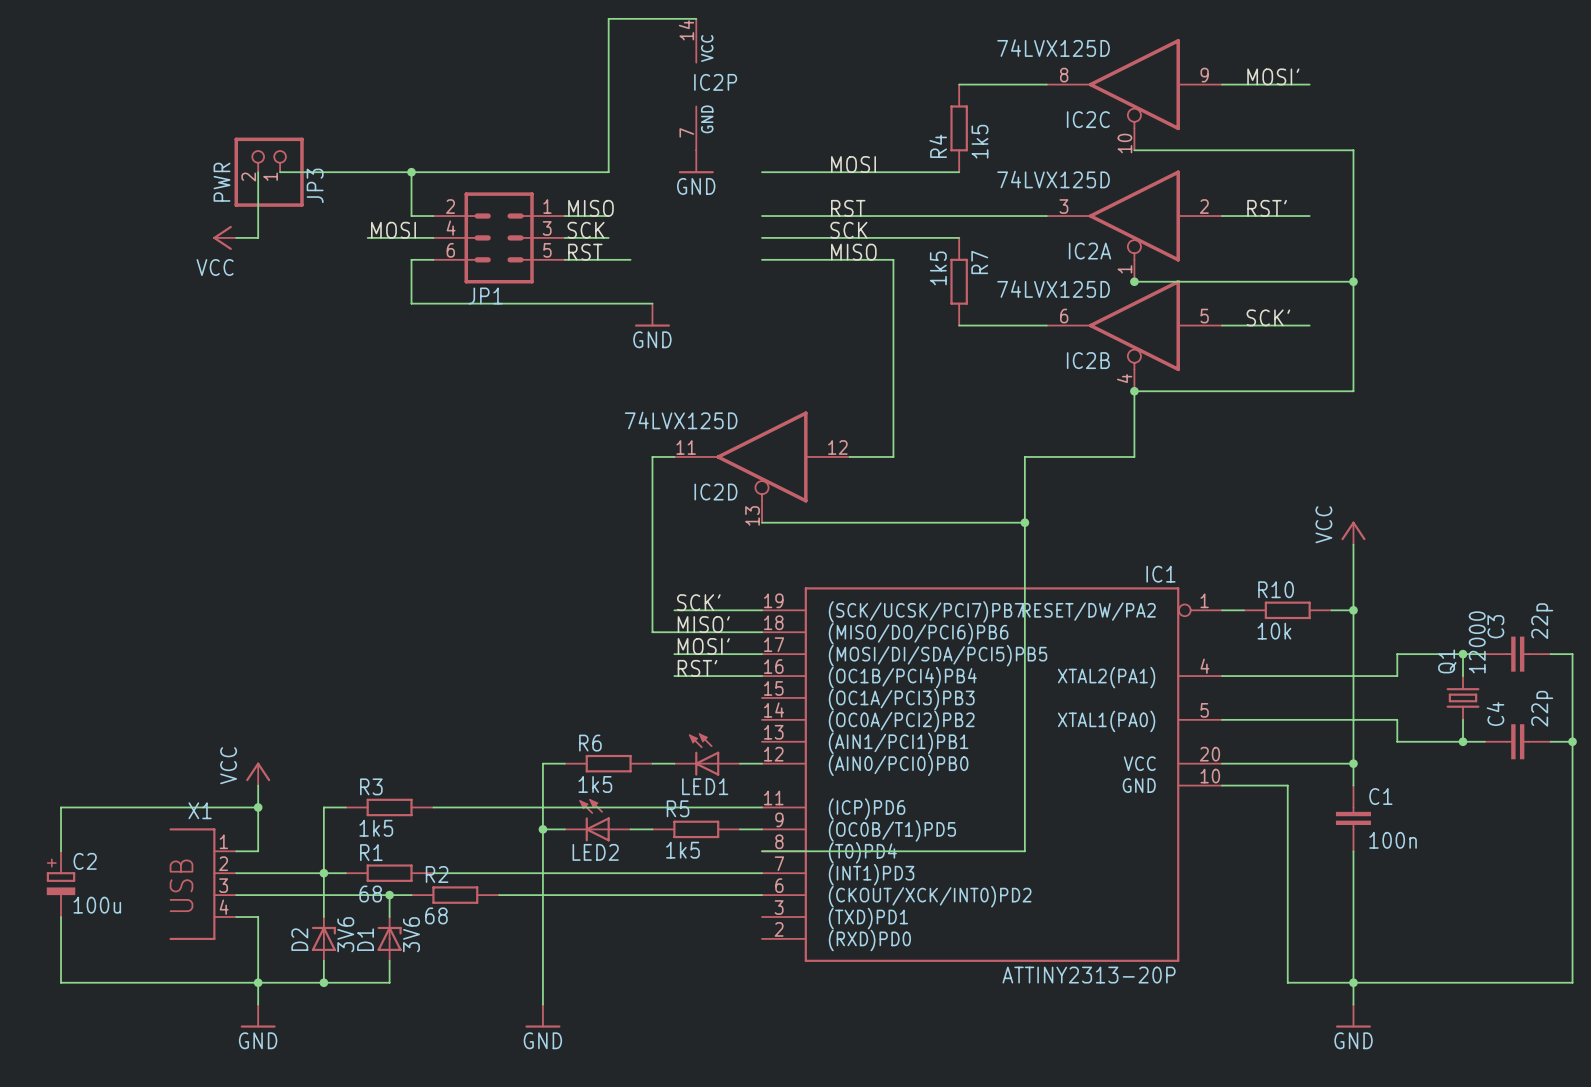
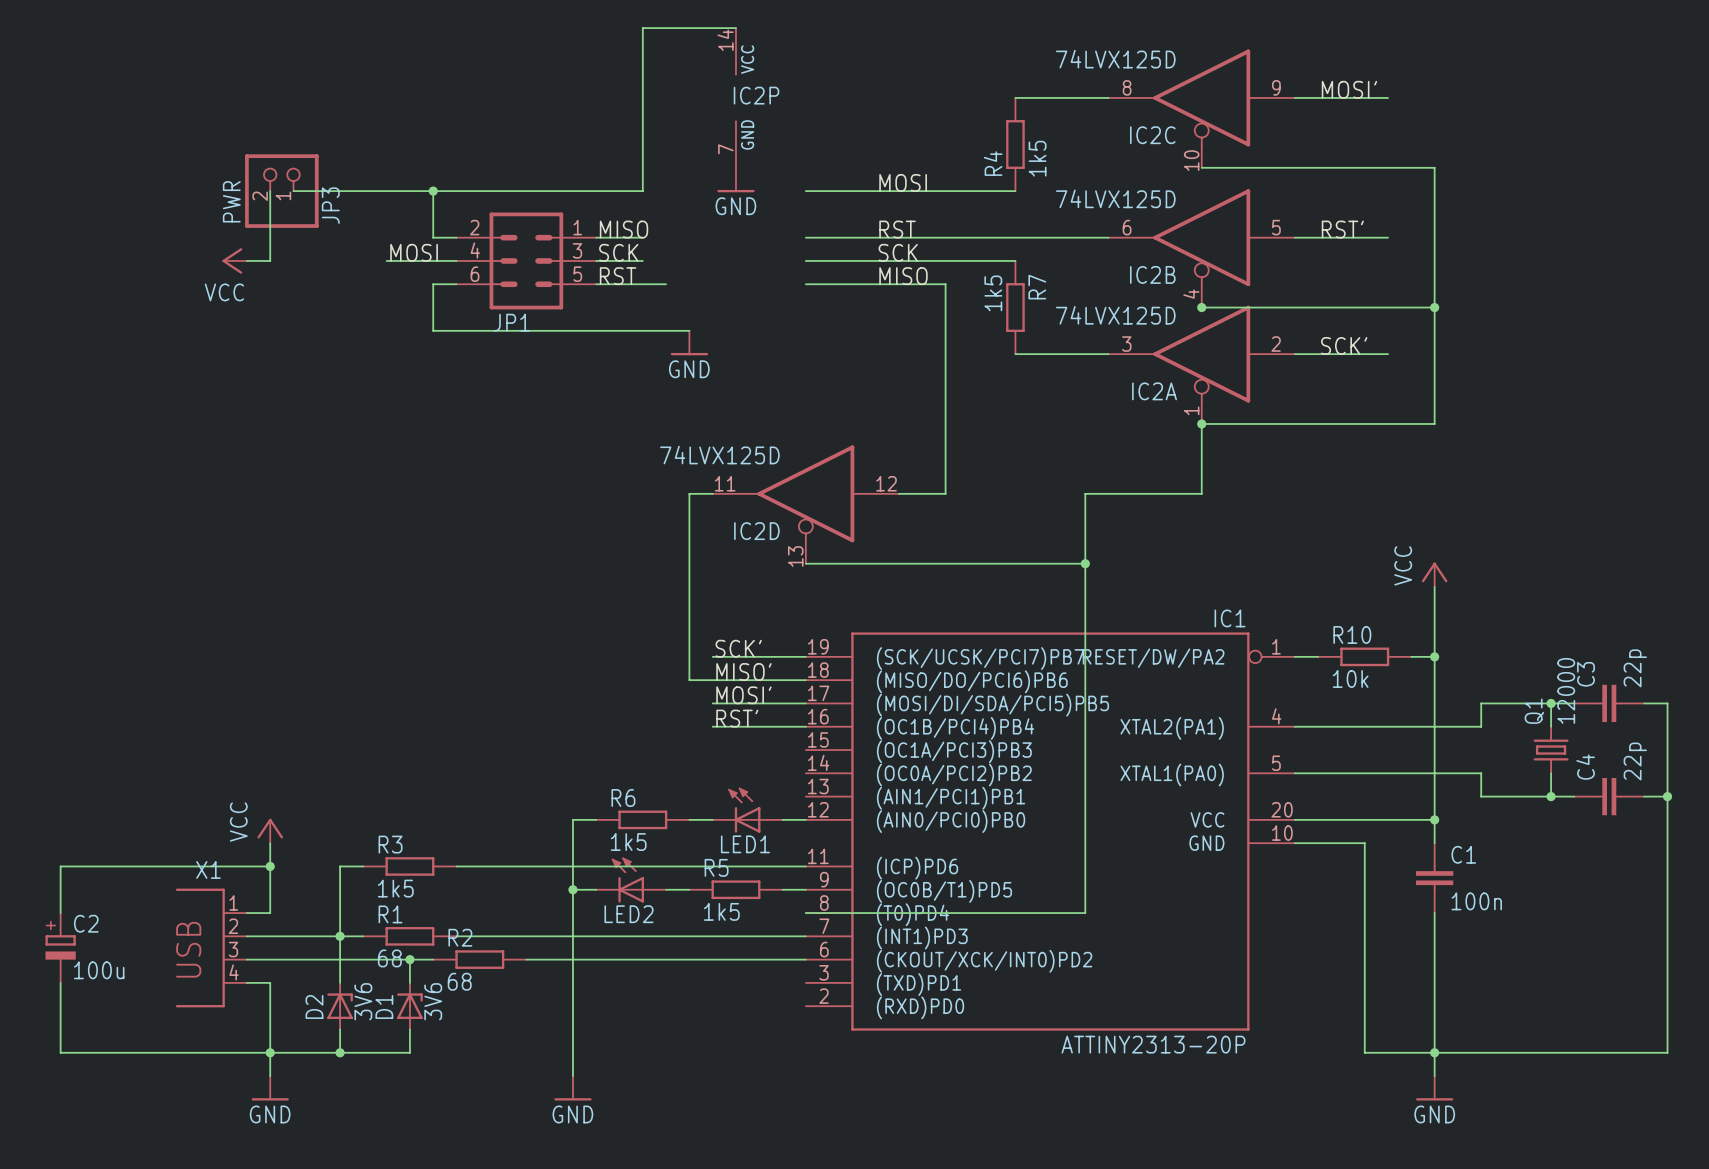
IC2A position: (1134, 226) -> (1201, 364)
IC2B position: (1134, 335) -> (1201, 248)

